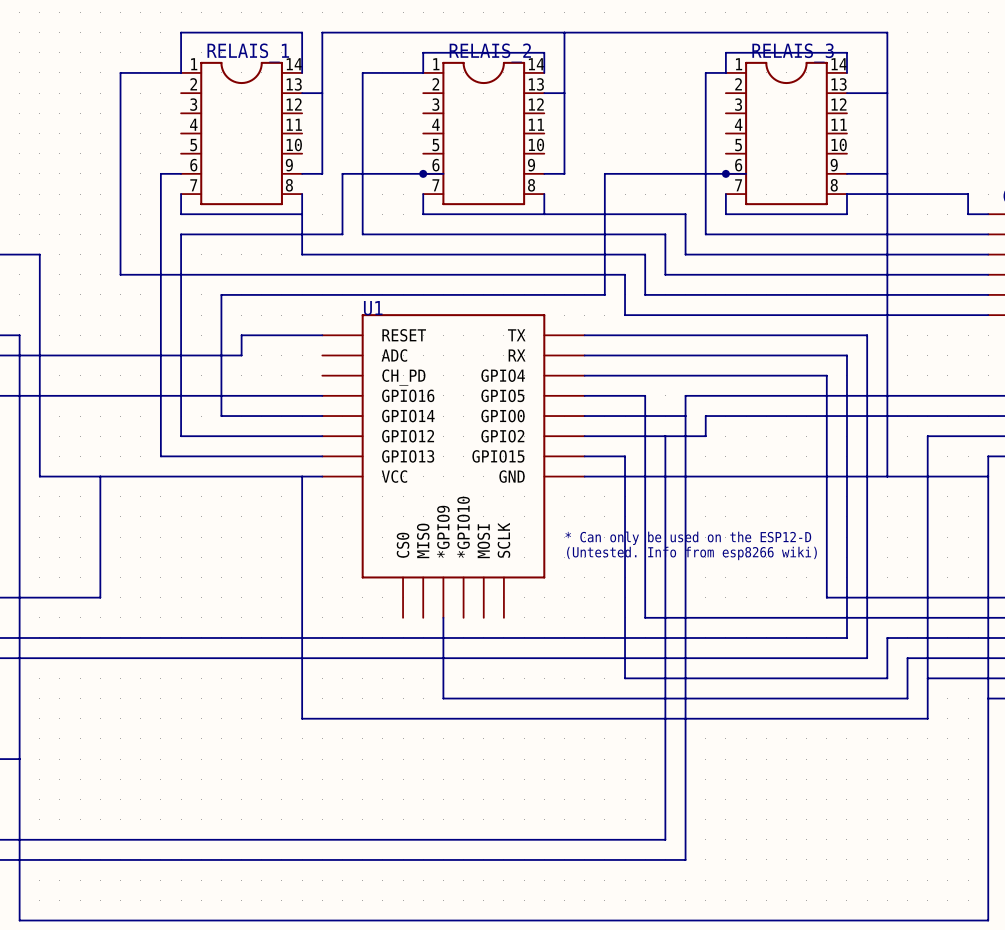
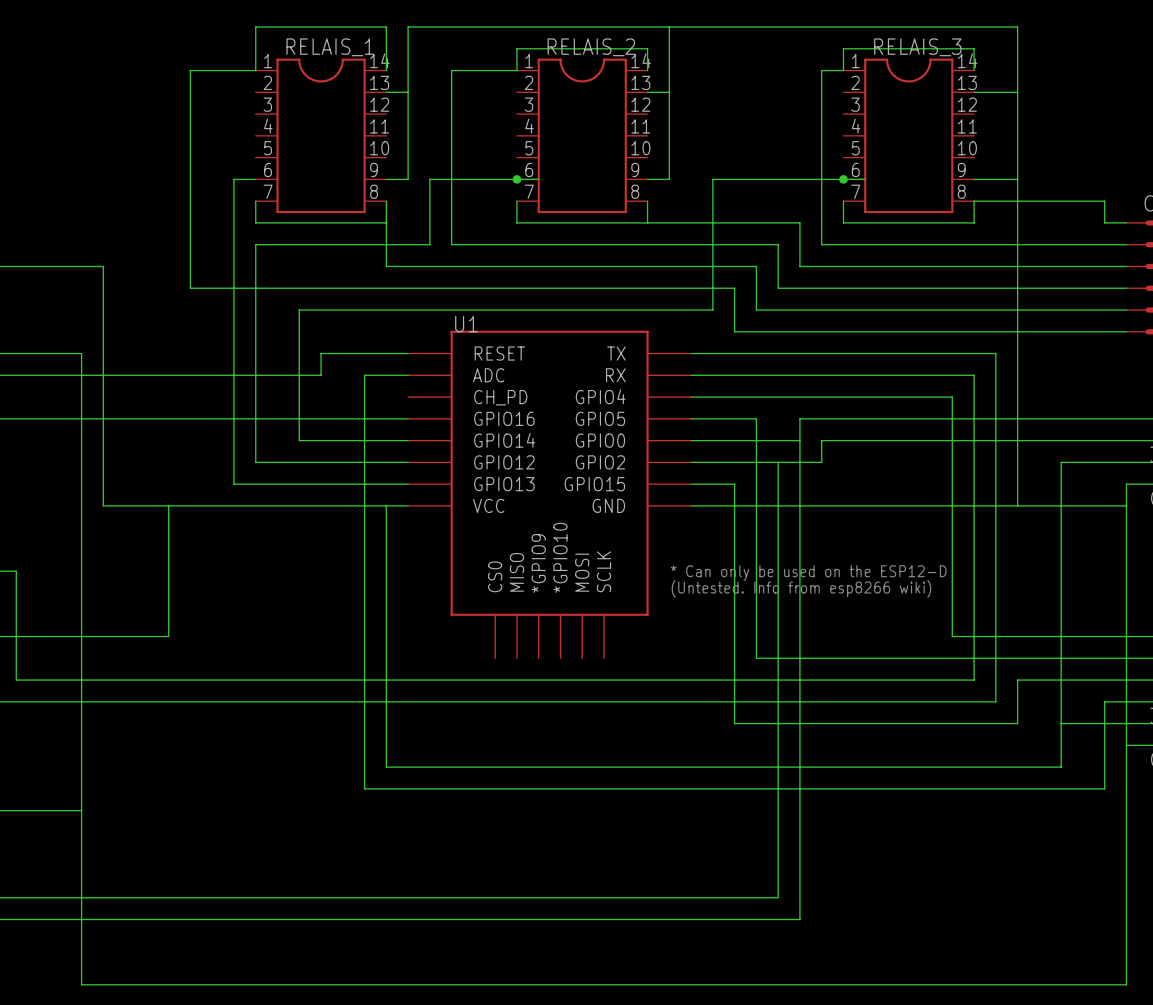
wire: (443, 617) (443, 698) (907, 698) (907, 658) (968, 658) -> (408, 375) (364, 375) (364, 788) (1104, 788) (1104, 701)

